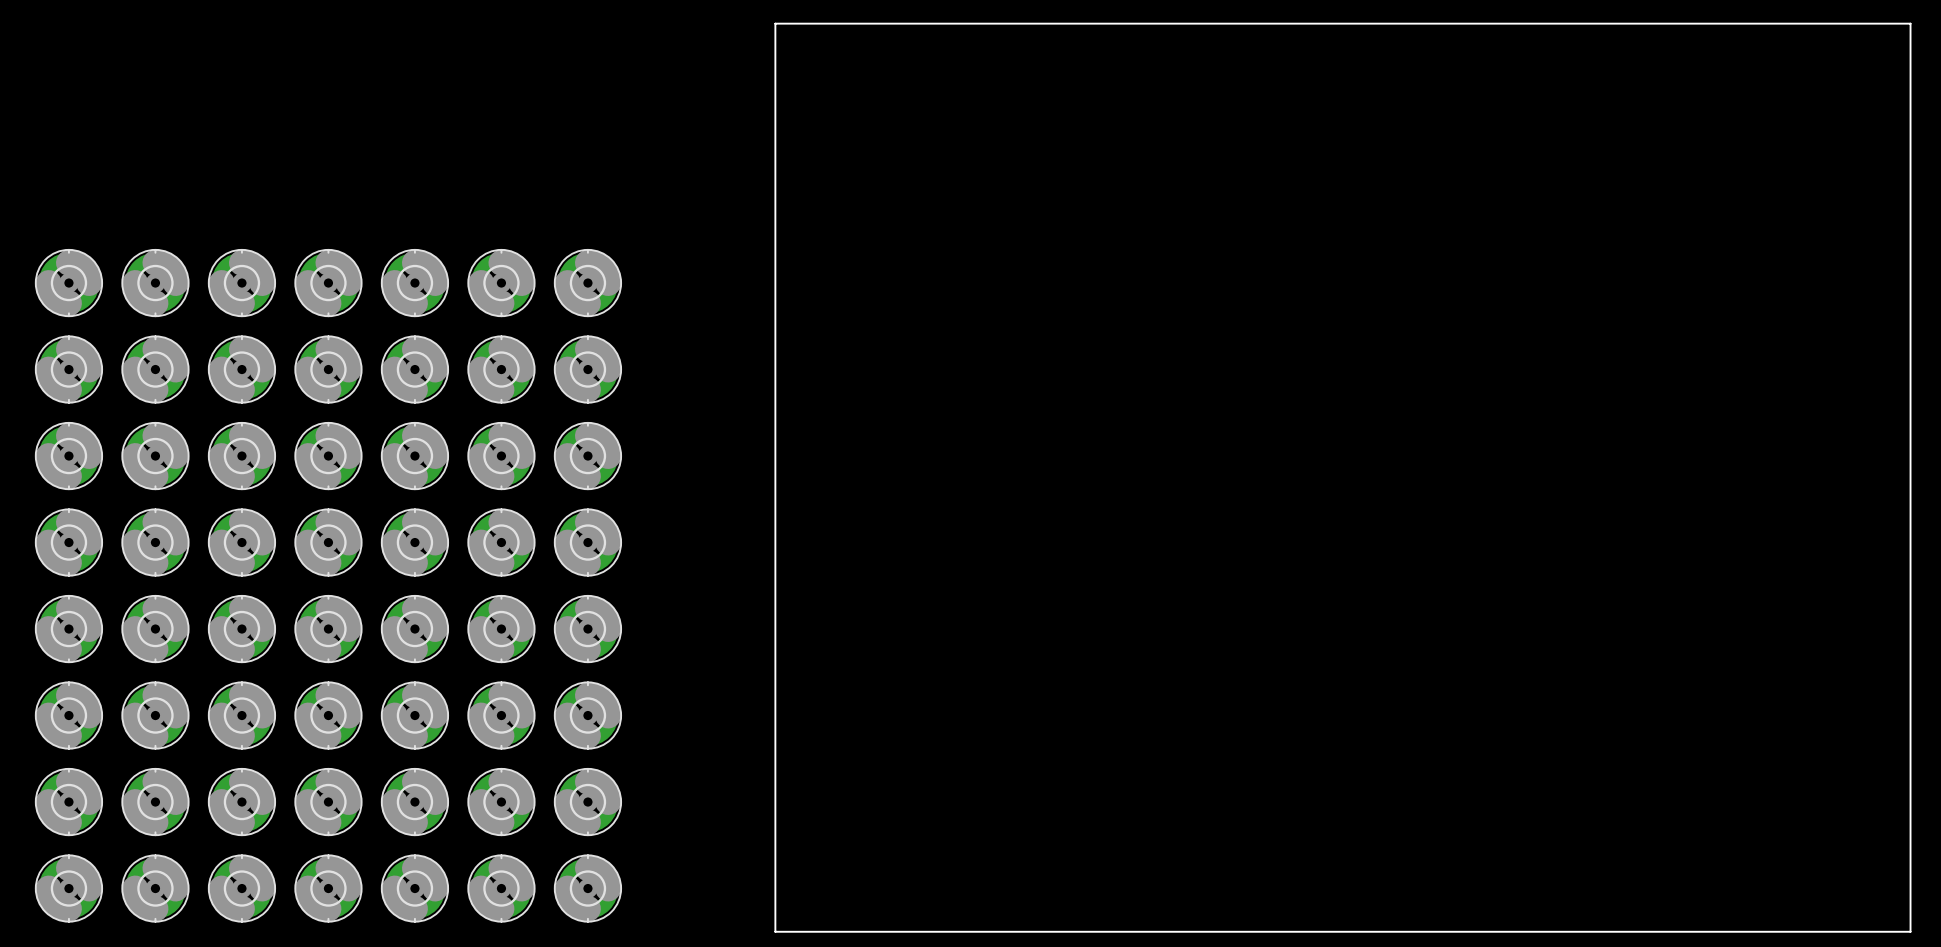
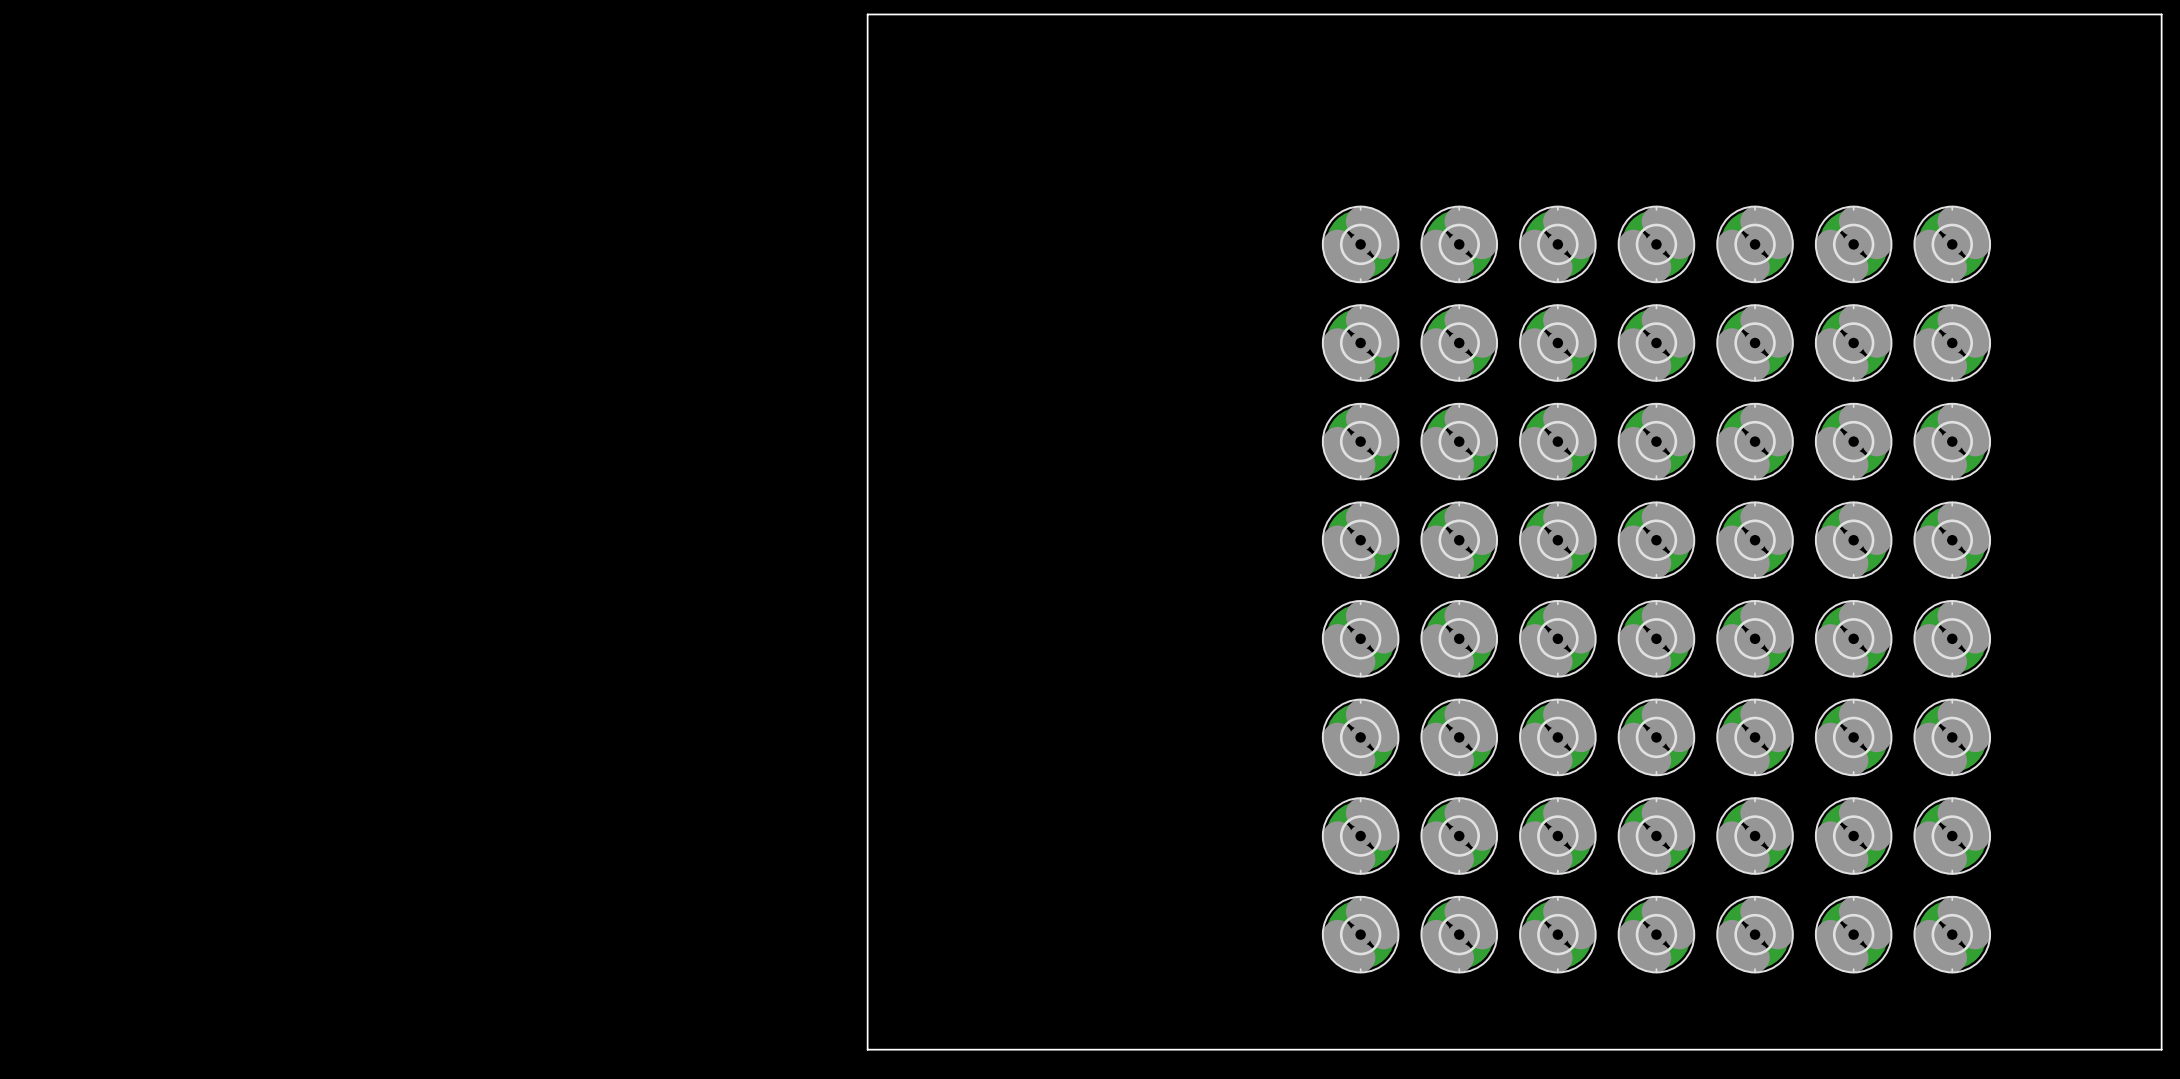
part: none -> (1360, 244)
part: none -> (1459, 244)
part: none -> (1557, 244)
part: none -> (1656, 244)
part: none -> (1755, 244)
part: none -> (1853, 244)
part: none -> (1952, 244)
part: (68, 283) -> none
part: (155, 283) -> none
part: (241, 283) -> none
part: (328, 283) -> none
part: (414, 283) -> none
part: (501, 283) -> none
part: (587, 283) -> none
part: none -> (1360, 343)
part: none -> (1459, 343)
part: none -> (1557, 343)
part: none -> (1656, 343)
part: none -> (1755, 343)
part: none -> (1853, 343)
part: none -> (1952, 343)
part: (68, 369) -> none
part: (155, 369) -> none
part: (241, 369) -> none
part: (328, 369) -> none
part: (414, 369) -> none
part: (501, 369) -> none
part: (587, 369) -> none
part: none -> (1360, 441)
part: none -> (1459, 441)
part: none -> (1557, 441)
part: none -> (1656, 441)
part: none -> (1755, 441)
part: none -> (1853, 441)
part: none -> (1952, 441)
part: (68, 456) -> none
part: (155, 456) -> none
part: (241, 456) -> none
part: (328, 456) -> none
part: (414, 456) -> none
part: (501, 456) -> none
part: (587, 456) -> none
part: none -> (1360, 540)
part: none -> (1459, 540)
part: none -> (1557, 540)
part: none -> (1656, 540)
part: none -> (1755, 540)
part: none -> (1853, 540)
part: none -> (1952, 540)
part: (68, 542) -> none
part: (155, 542) -> none
part: (241, 542) -> none
part: (328, 542) -> none
part: (414, 542) -> none
part: (501, 542) -> none
part: (587, 542) -> none
part: none -> (1360, 638)
part: none -> (1459, 638)
part: none -> (1557, 638)
part: none -> (1656, 638)
part: none -> (1755, 638)
part: none -> (1853, 638)
part: none -> (1952, 638)
part: (68, 629) -> none
part: (155, 629) -> none
part: (241, 629) -> none
part: (328, 629) -> none
part: (414, 629) -> none
part: (501, 629) -> none
part: (587, 629) -> none
part: none -> (1360, 737)
part: none -> (1459, 737)
part: none -> (1557, 737)
part: none -> (1656, 737)
part: none -> (1755, 737)
part: none -> (1853, 737)
part: none -> (1952, 737)
part: (68, 715) -> none
part: (155, 715) -> none
part: (241, 715) -> none
part: (328, 715) -> none
part: (414, 715) -> none
part: (501, 715) -> none
part: (587, 715) -> none
part: none -> (1360, 836)
part: none -> (1459, 836)
part: none -> (1557, 836)
part: none -> (1656, 836)
part: none -> (1755, 836)
part: none -> (1853, 836)
part: none -> (1952, 836)
part: (68, 802) -> none
part: (155, 802) -> none
part: (241, 802) -> none
part: (328, 802) -> none
part: (414, 802) -> none
part: (501, 802) -> none
part: (587, 802) -> none
part: none -> (1360, 934)
part: none -> (1459, 934)
part: none -> (1557, 934)
part: none -> (1656, 934)
part: none -> (1755, 934)
part: none -> (1853, 934)
part: none -> (1952, 934)
part: (68, 888) -> none
part: (155, 888) -> none
part: (241, 888) -> none
part: (328, 888) -> none
part: (414, 888) -> none
part: (501, 888) -> none
part: (587, 888) -> none

